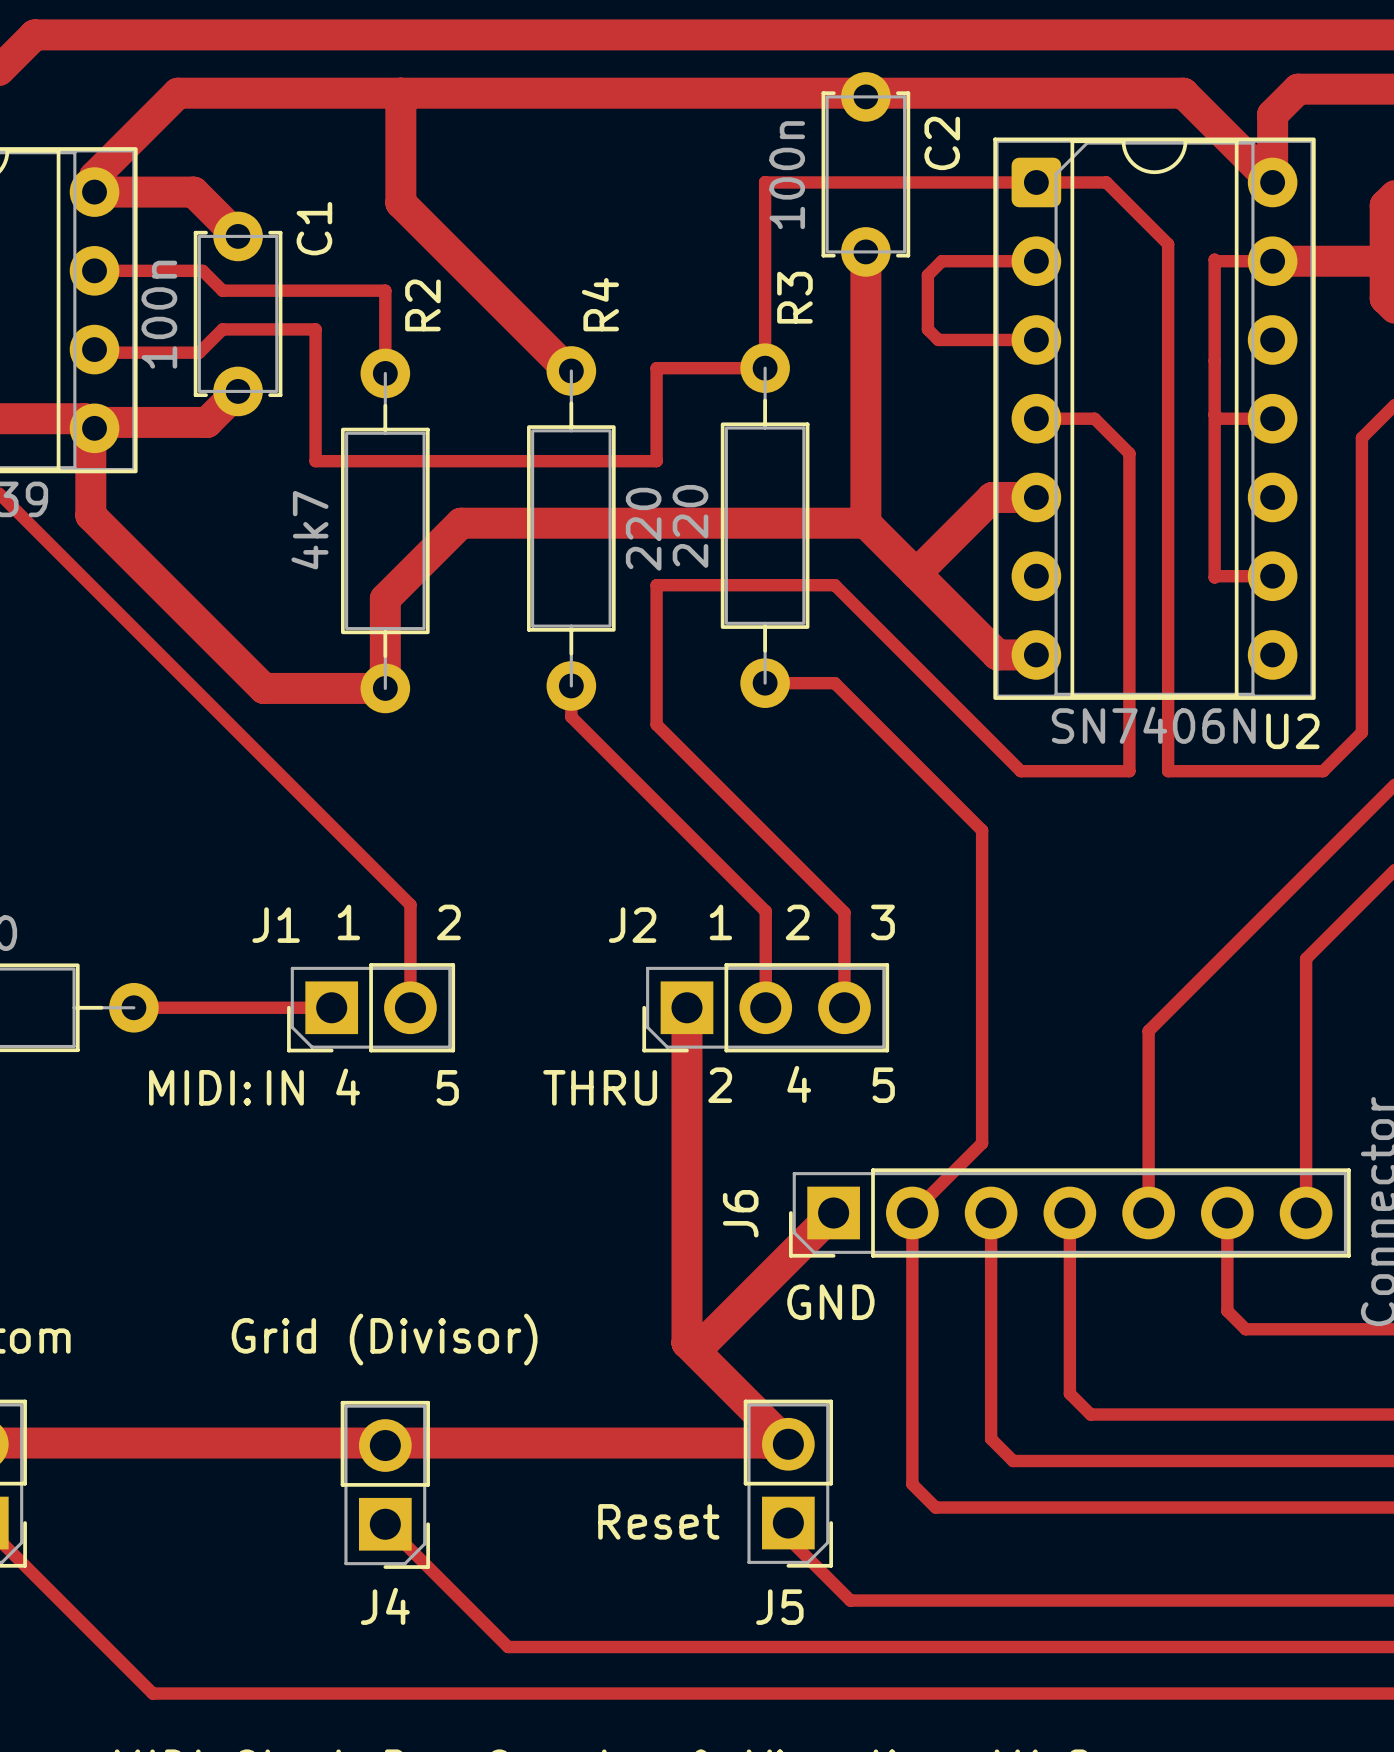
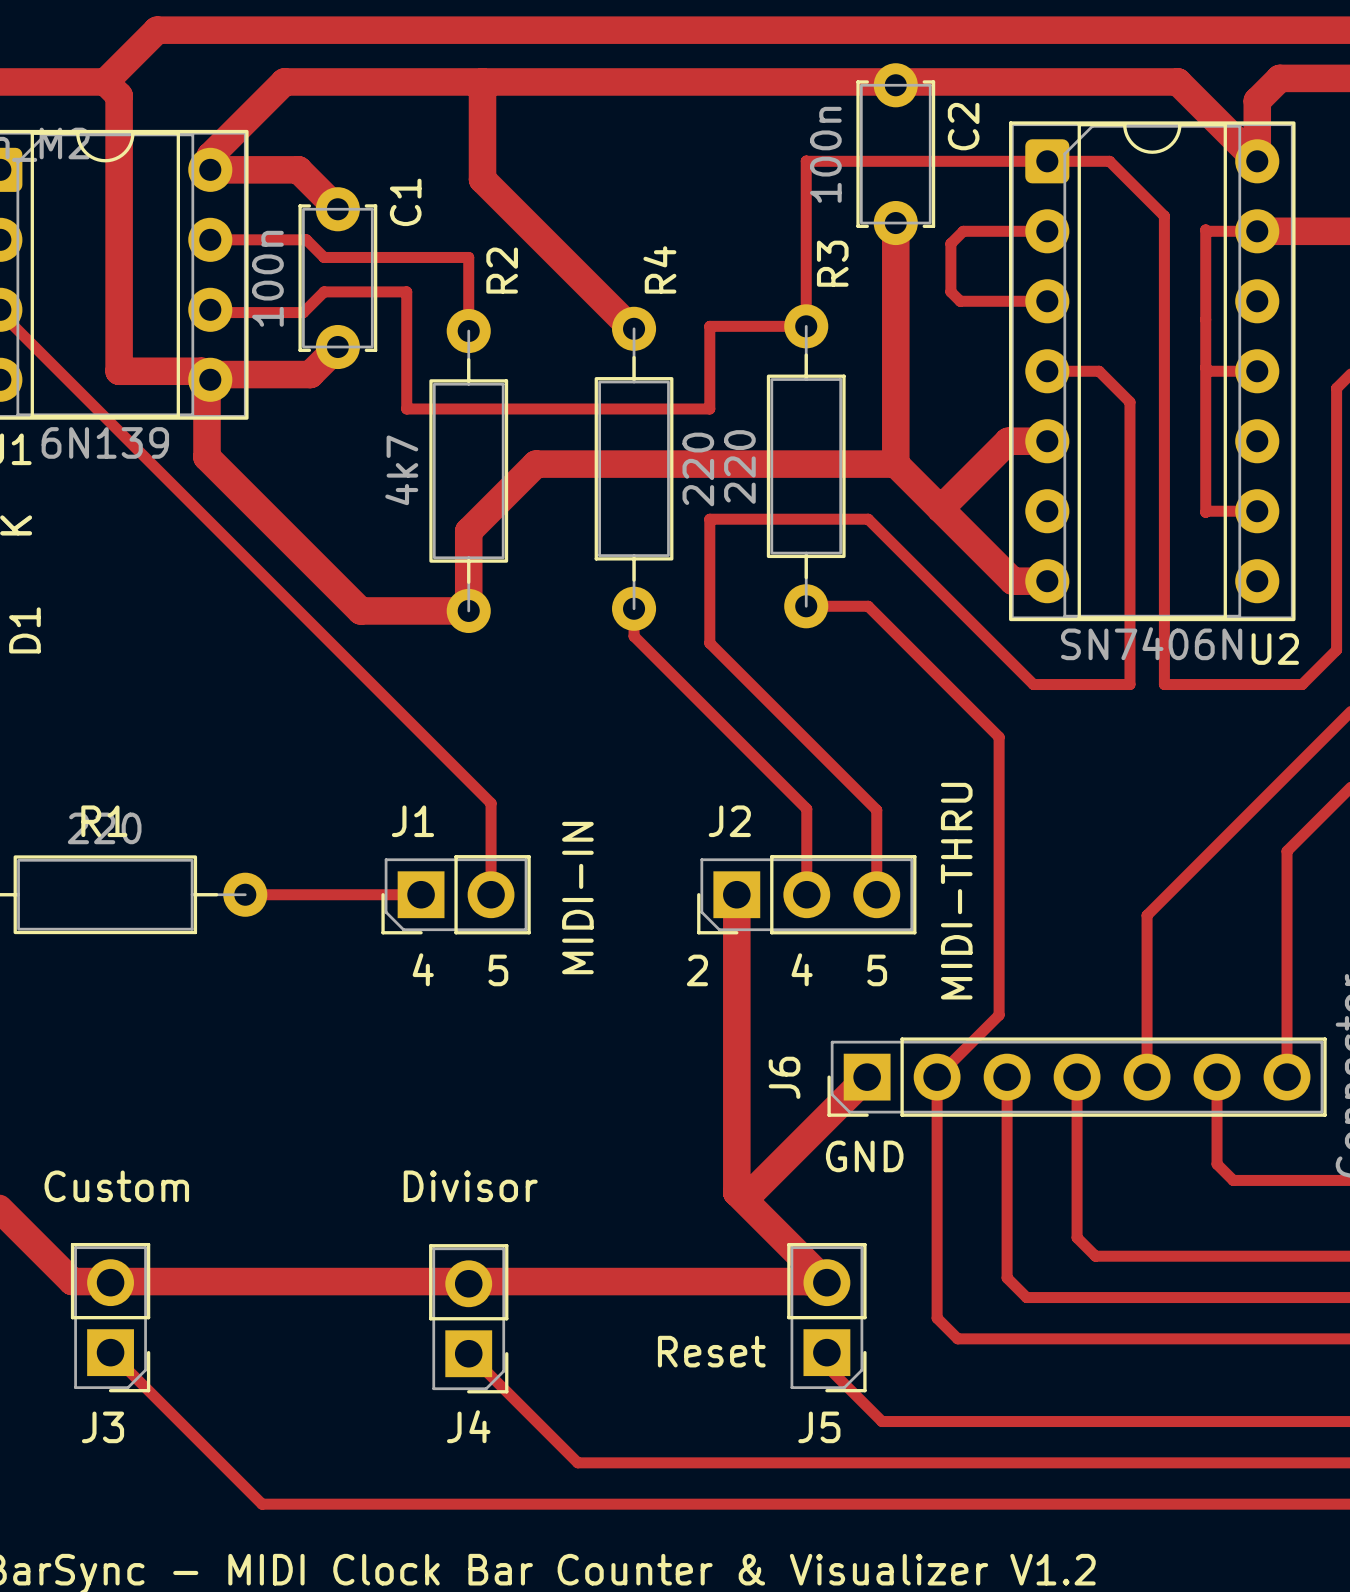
text: 1 (348, 922) -> none
text: 2 (448, 922) -> none
text: 1 (720, 922) -> none
text: 2 (797, 922) -> none
text: 3 (882, 922) -> none
J1 name position: J1 (276, 925) -> J1 (412, 821)
J2 name position: J2 (632, 925) -> J2 (729, 821)
text position: 4 (799, 1084) -> 4 (802, 969)
text position: 2 (720, 1085) -> 2 (697, 970)
text position: 5 (883, 1085) -> 5 (877, 970)
J1 value: MIDI: (200, 1087) -> MIDI-IN (577, 898)
text: IN 4 5 (362, 1087) -> none
J2 value: THRU (600, 1087) -> MIDI-THRU (956, 891)
text: none -> 4 (423, 969)
text: none -> 5 (498, 970)
J4 value: Grid (Divisor) (384, 1339) -> Divisor (470, 1186)

